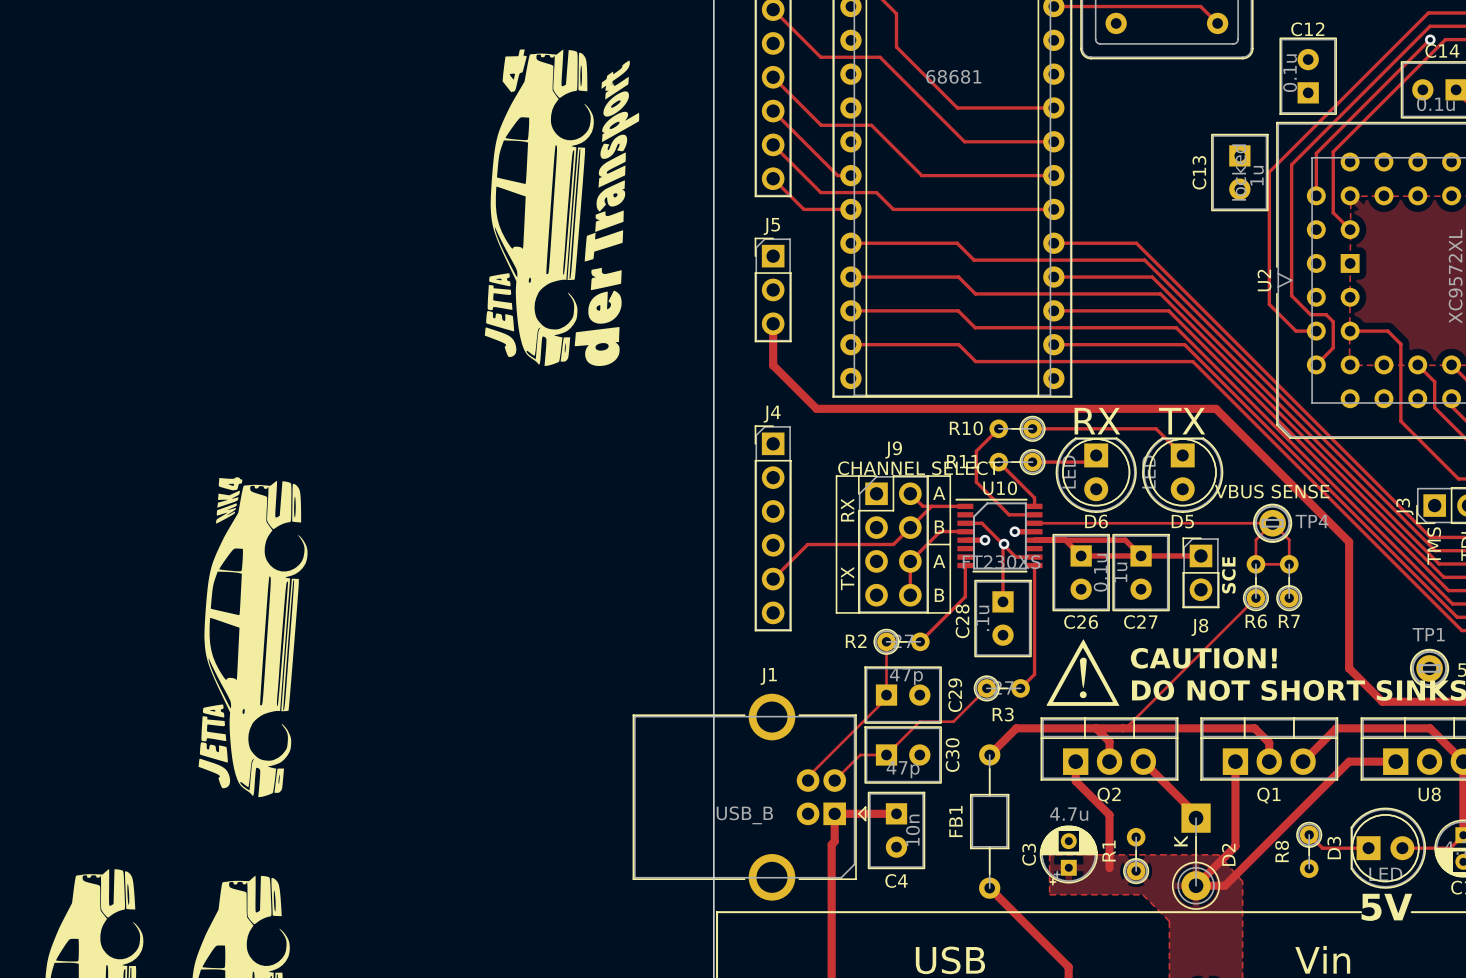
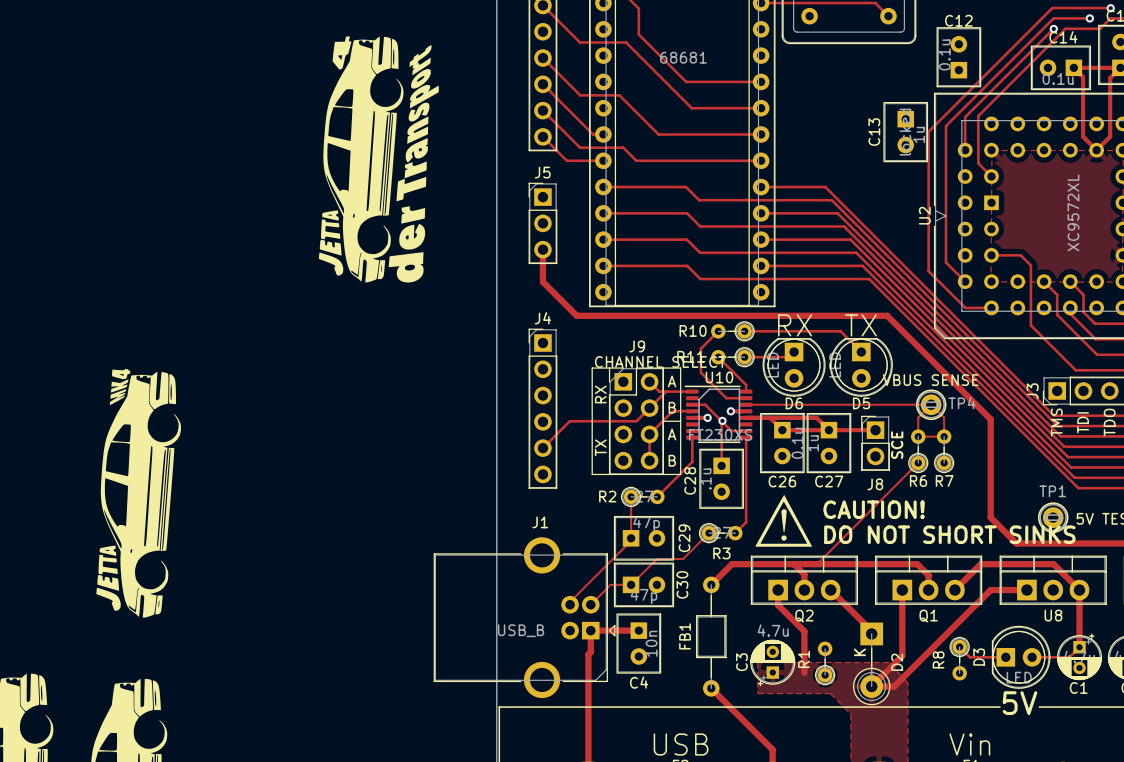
track: (1291, 295) (1310, 314) (1326, 314) (1333, 321) (1333, 348) (1316, 364) -> (946, 227) (946, 262)
track: (1269, 304) (1296, 331) (1316, 331) -> (928, 234) (928, 271) (965, 307) (991, 307)
track: none -> (946, 262) (965, 281)

